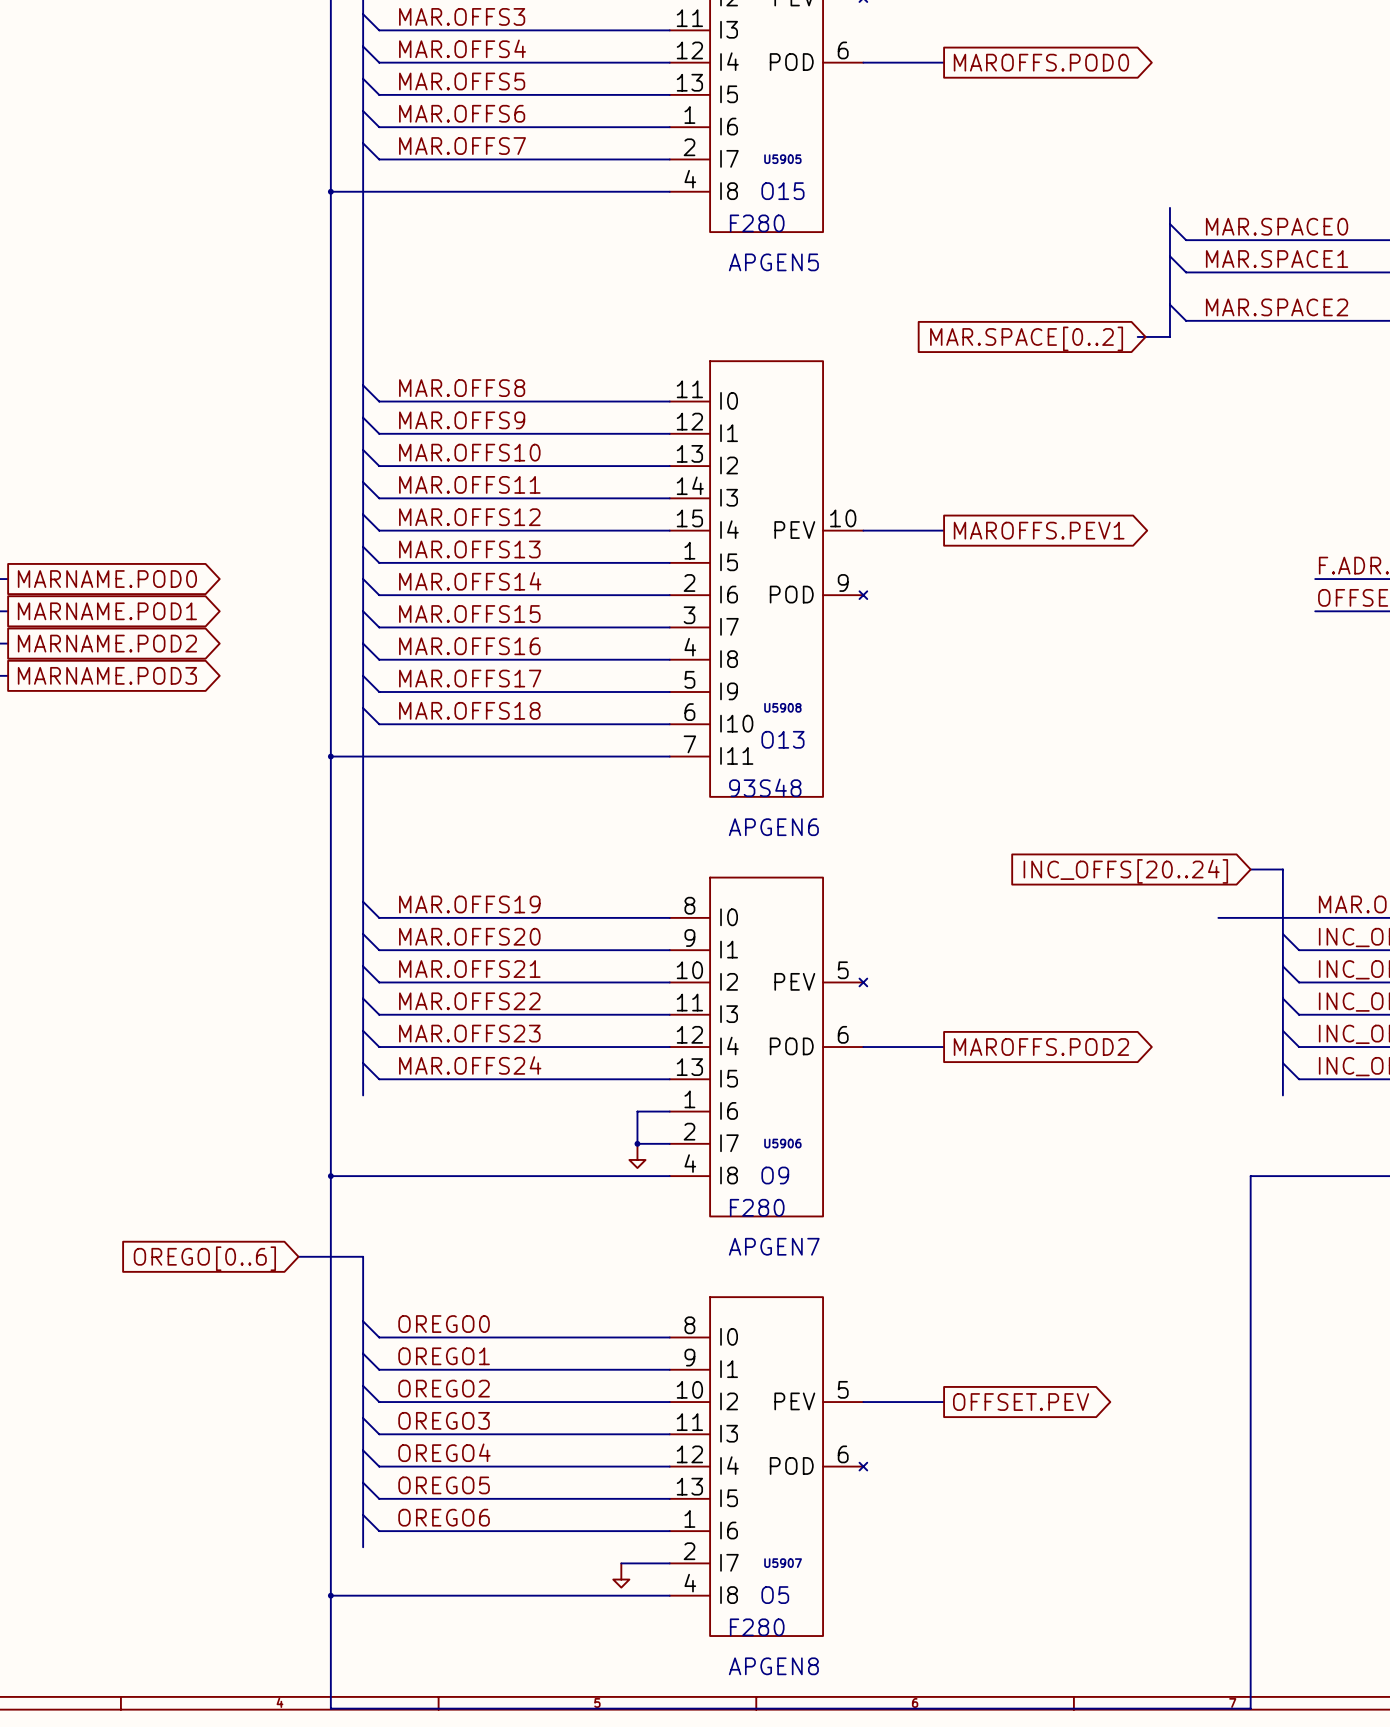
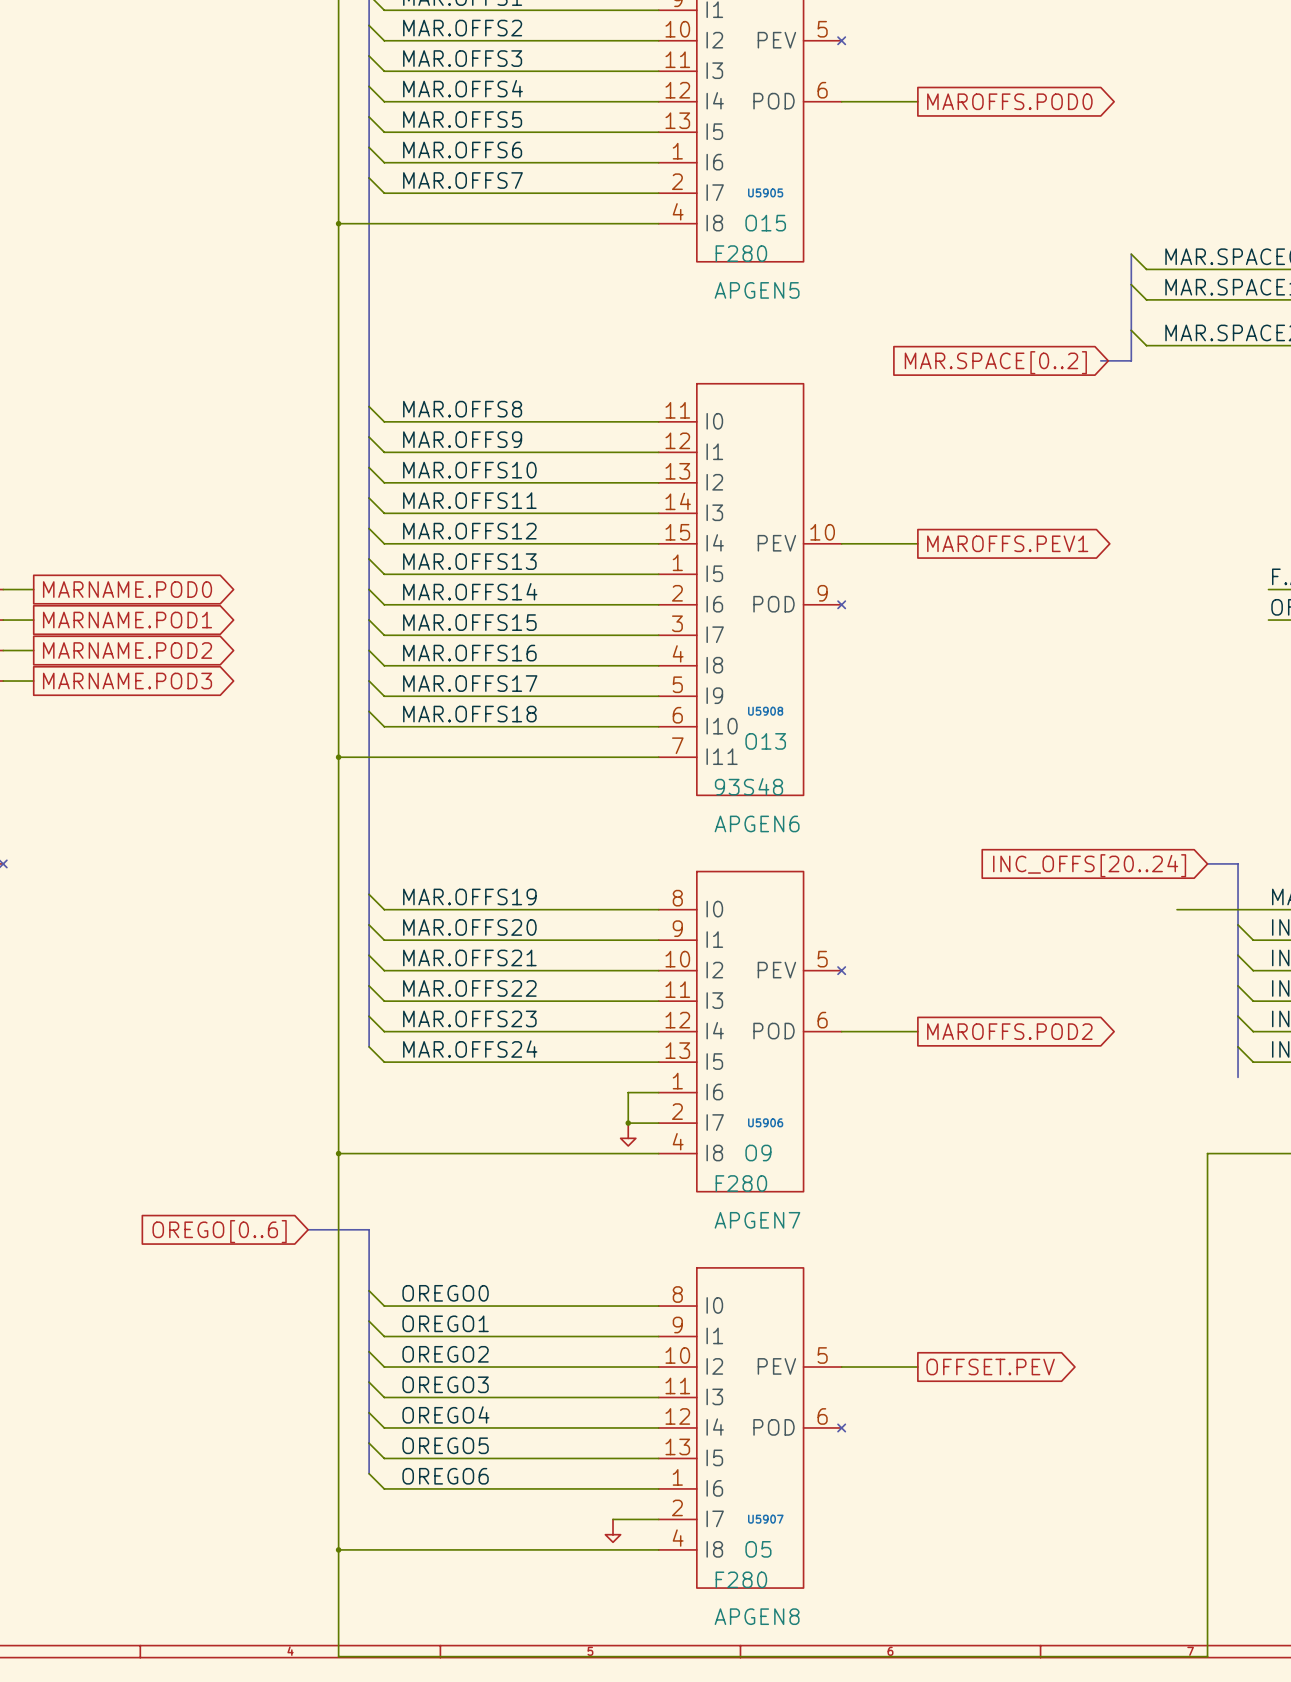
bus: (1169, 207) (1169, 224) -> none
bus: (363, 1063) (363, 1095) -> none
bus: (363, 1514) (363, 1547) -> none

